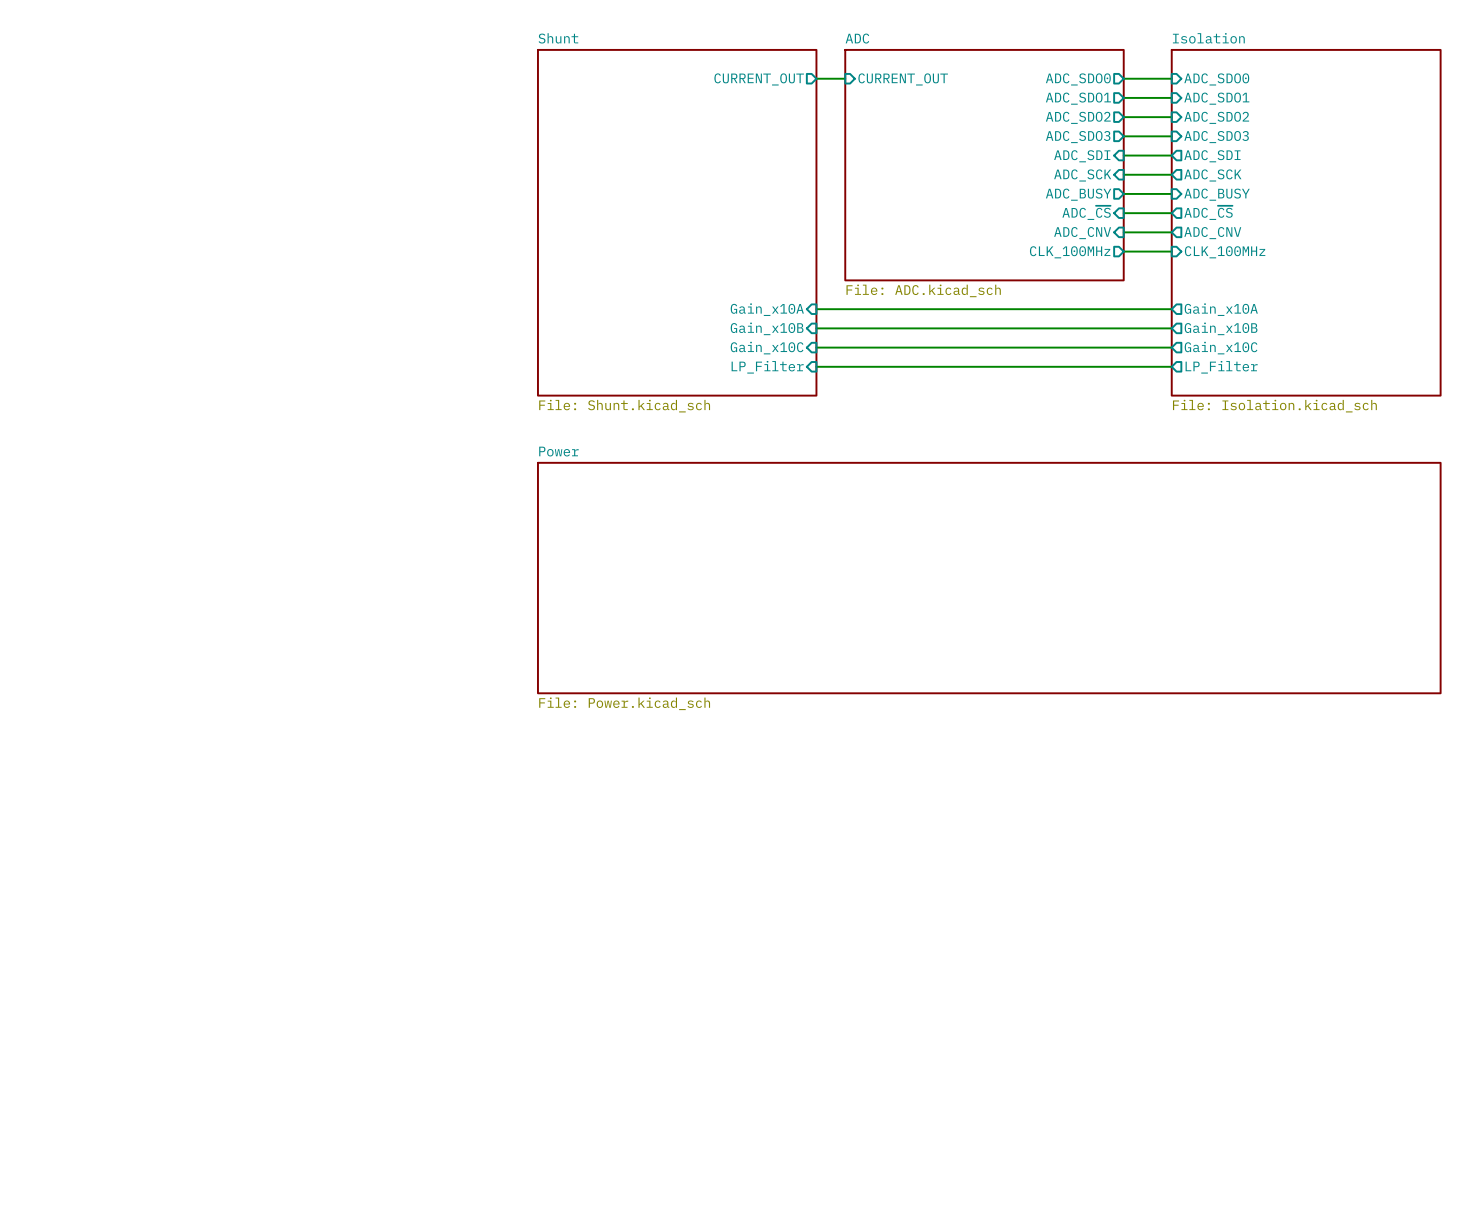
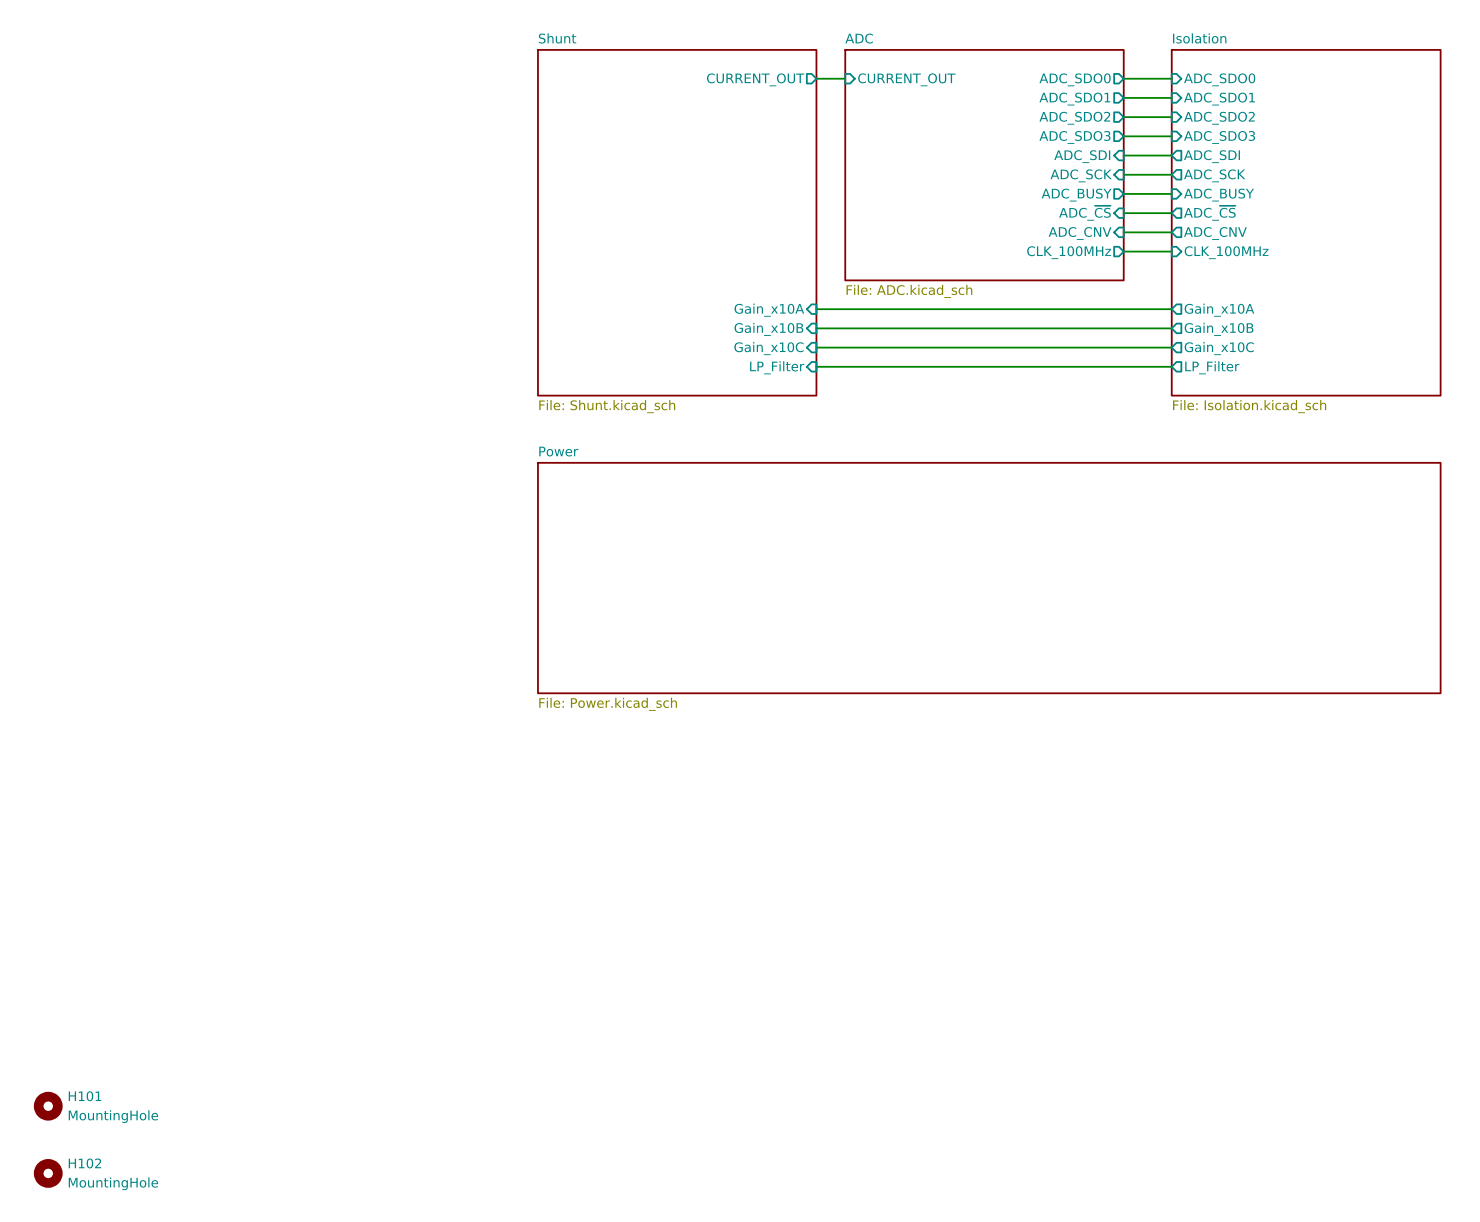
H101: none -> MountingHole (48, 1106)
H102: none -> MountingHole (48, 1173)

